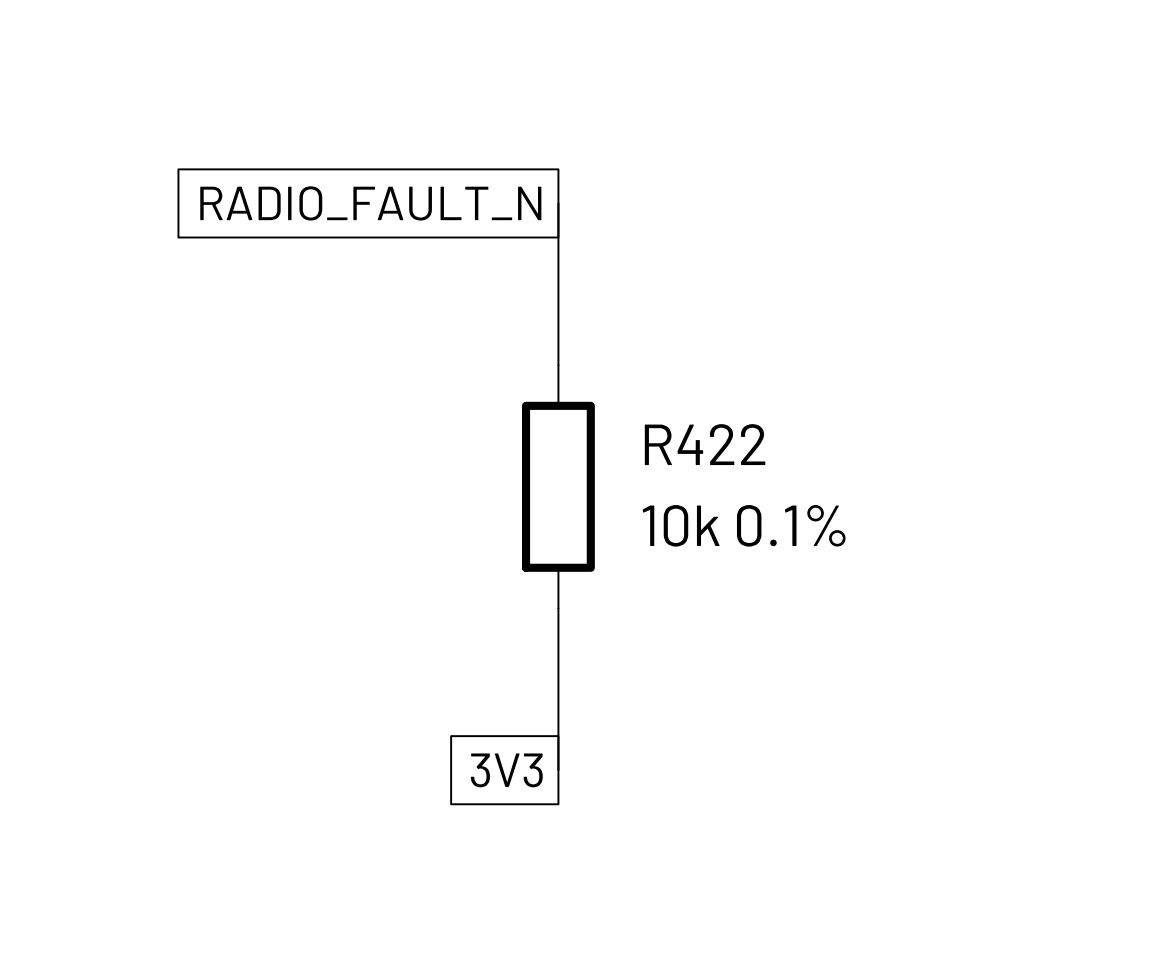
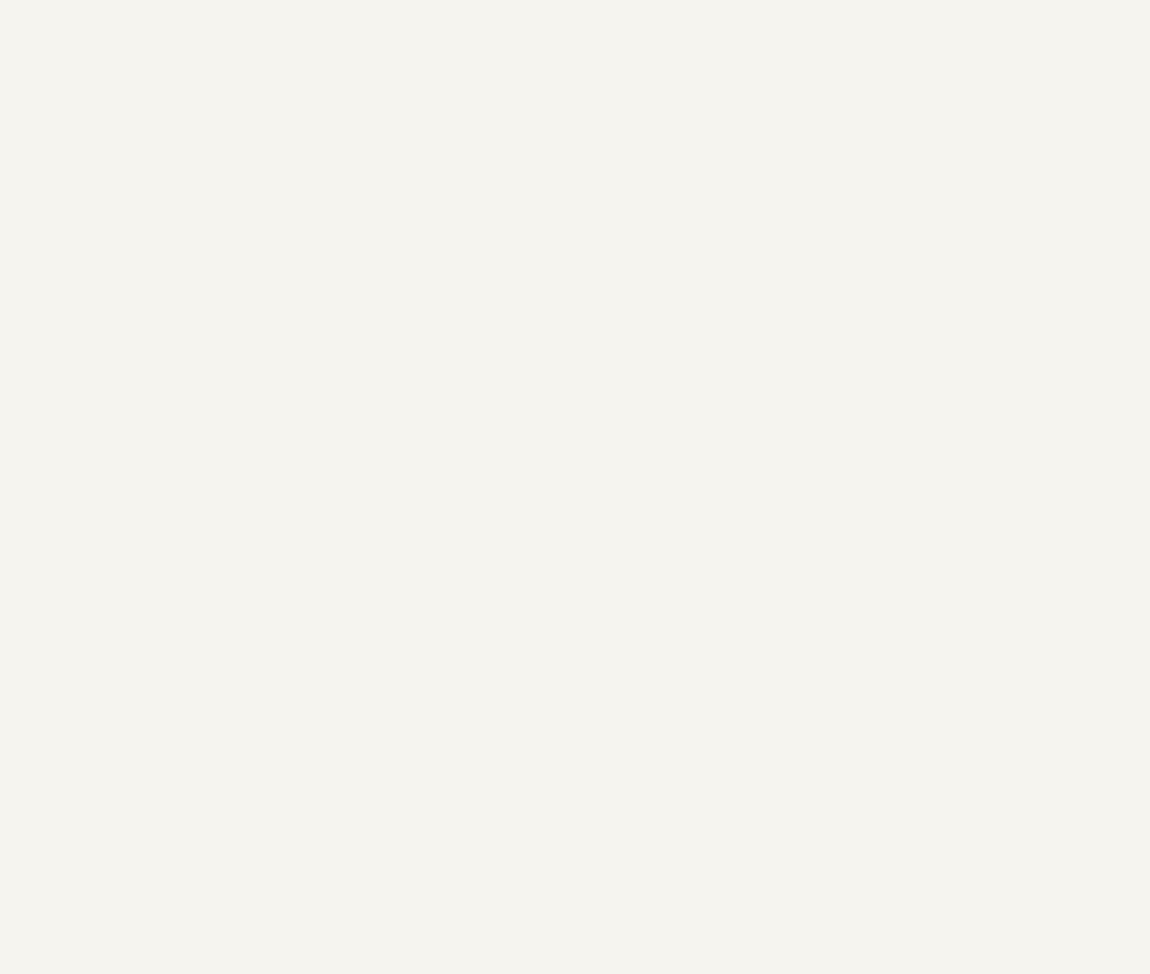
global label: RADIO_FAULT_N (370, 203) -> none
wire: (558, 203) (558, 365) -> none
R422: 10k 0.1% (558, 486) -> none
wire: (558, 608) (558, 770) -> none
global label: 3V3 (506, 770) -> none

